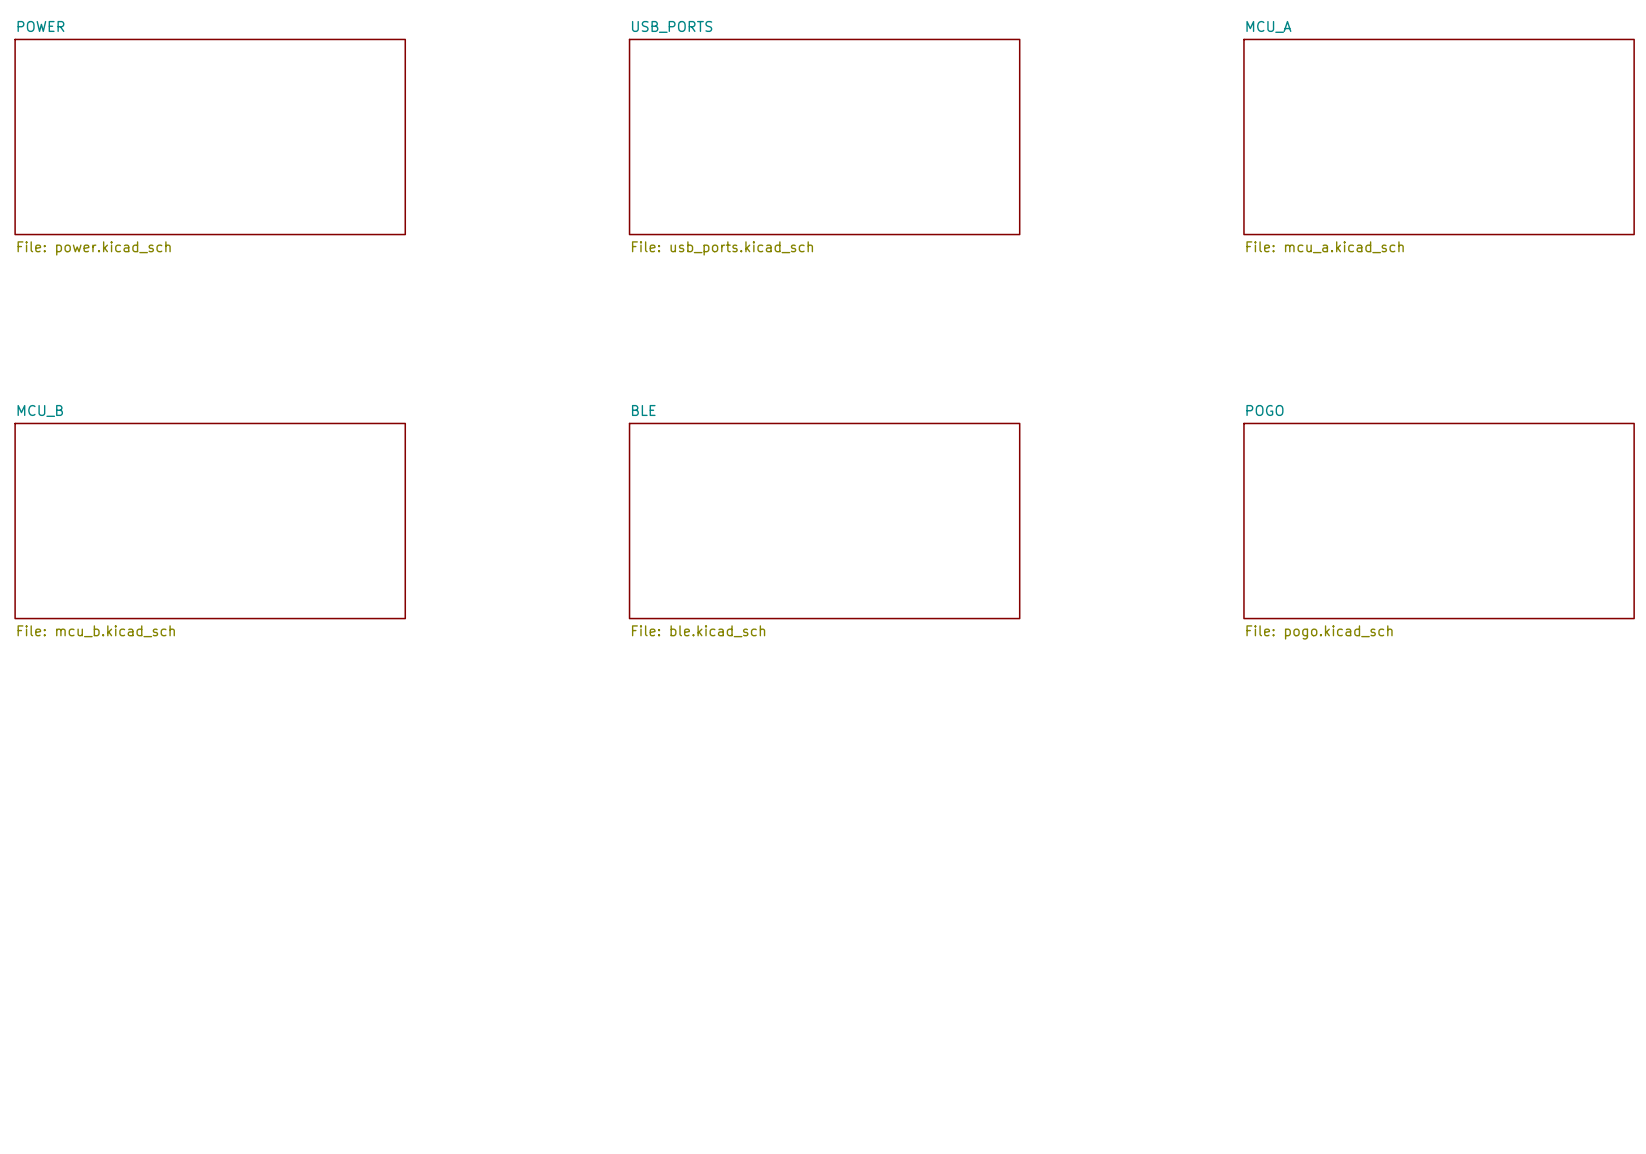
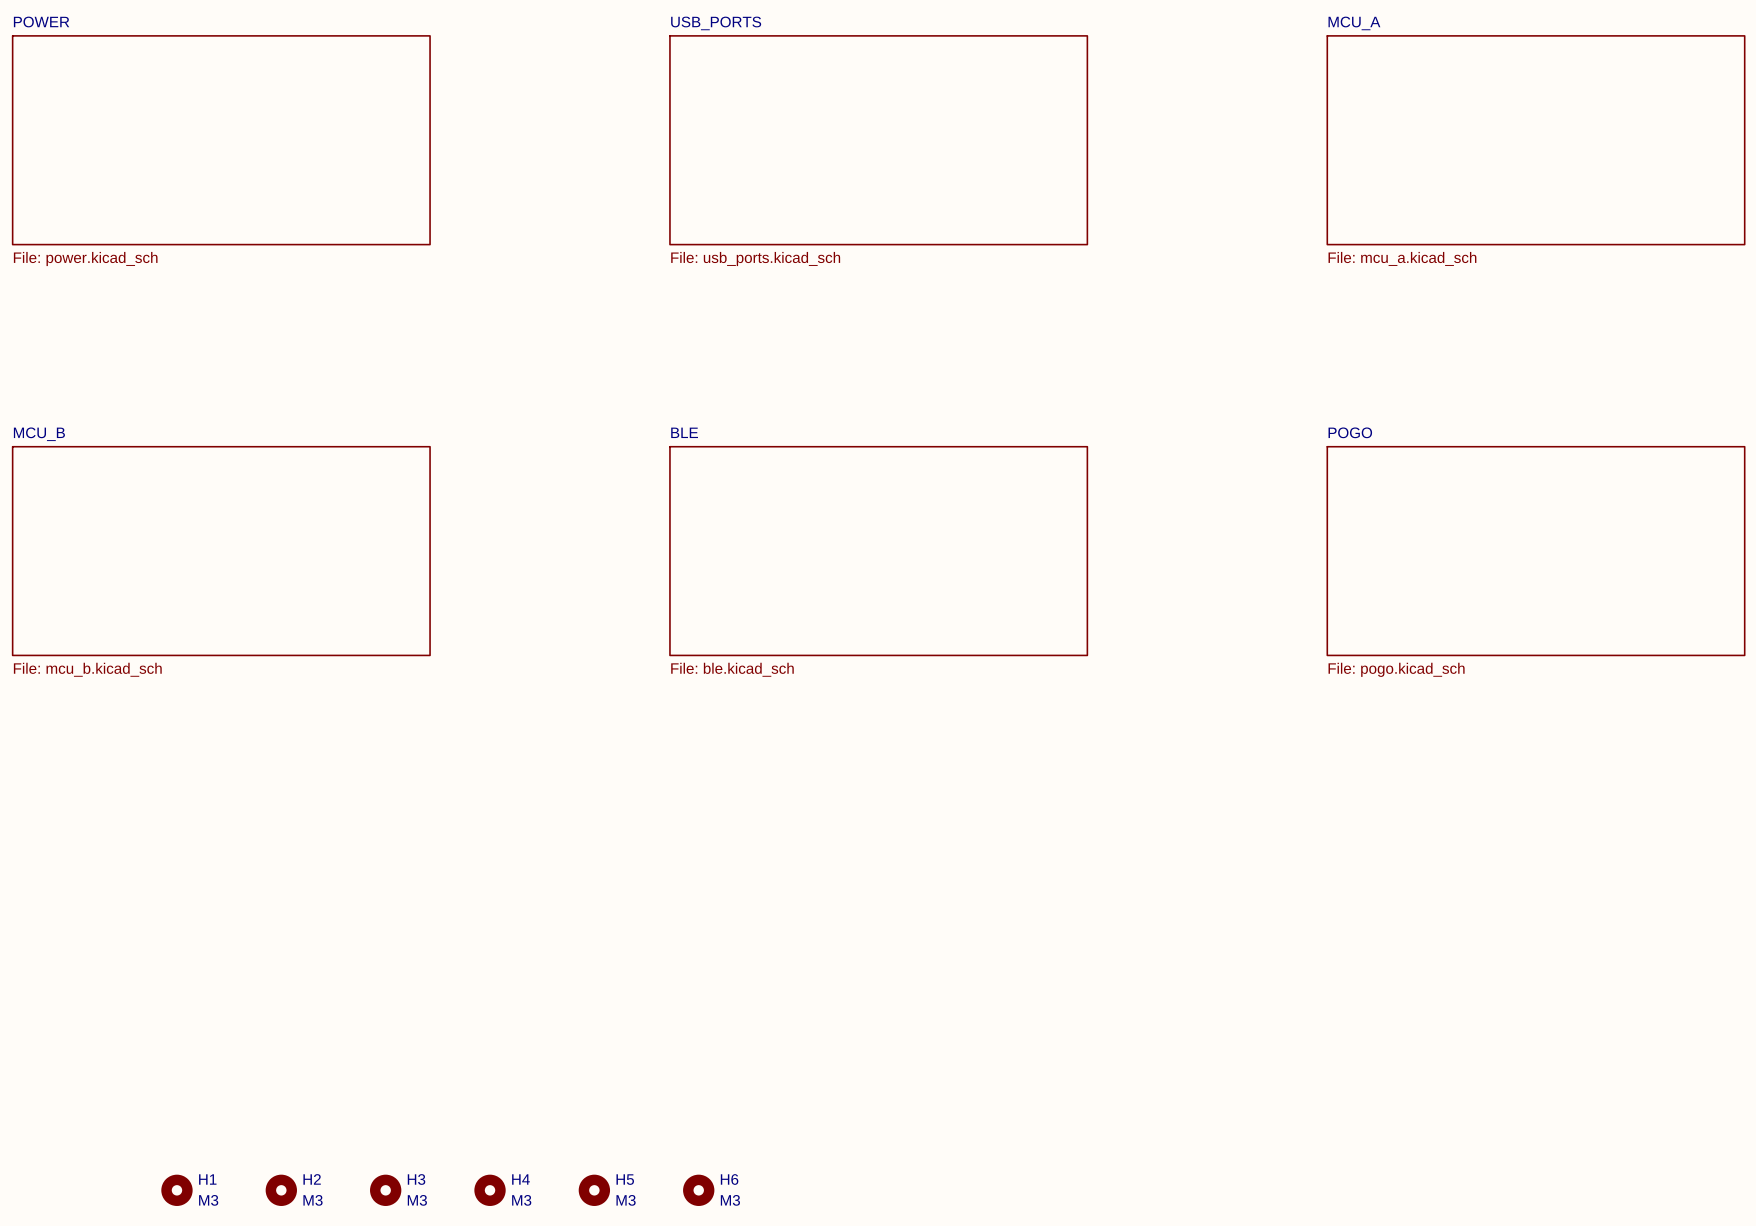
H1: none -> M3 (176, 1190)
H2: none -> M3 (281, 1190)
H3: none -> M3 (385, 1190)
H4: none -> M3 (490, 1190)
H5: none -> M3 (594, 1190)
H6: none -> M3 (698, 1190)

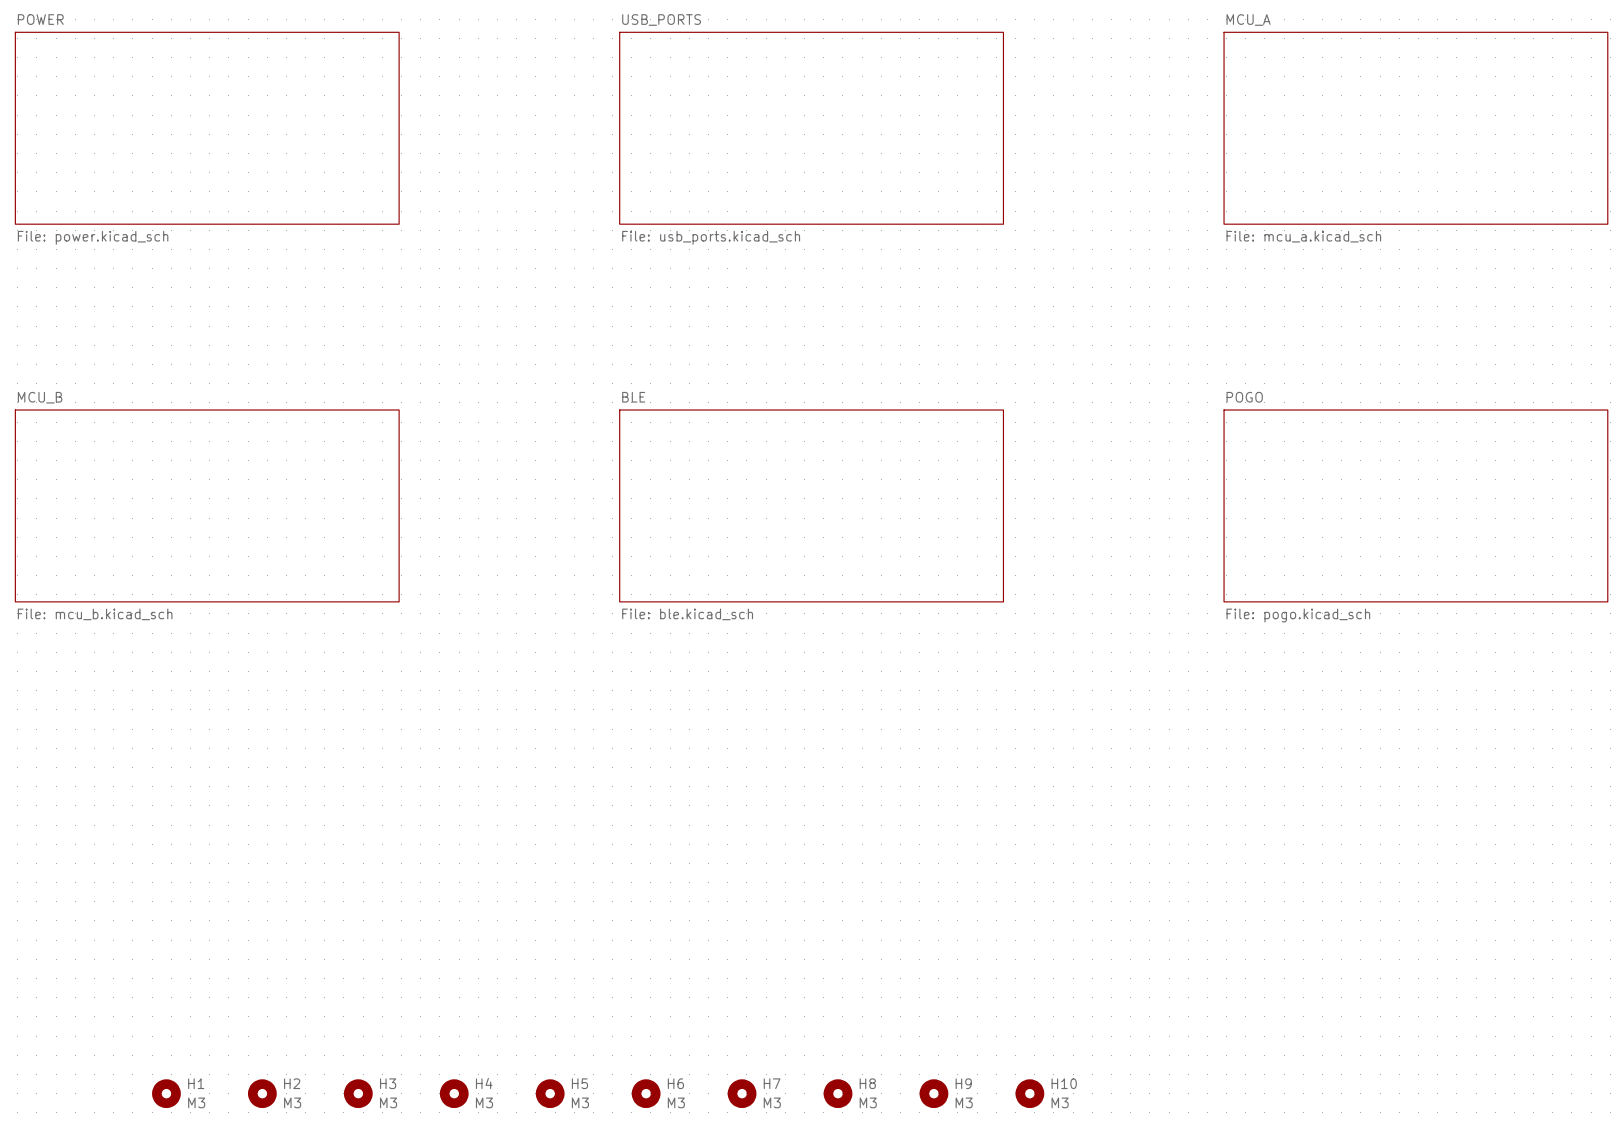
H7: none -> M3 (742, 1093)
H8: none -> M3 (838, 1093)
H9: none -> M3 (933, 1093)
H10: none -> M3 (1029, 1093)

